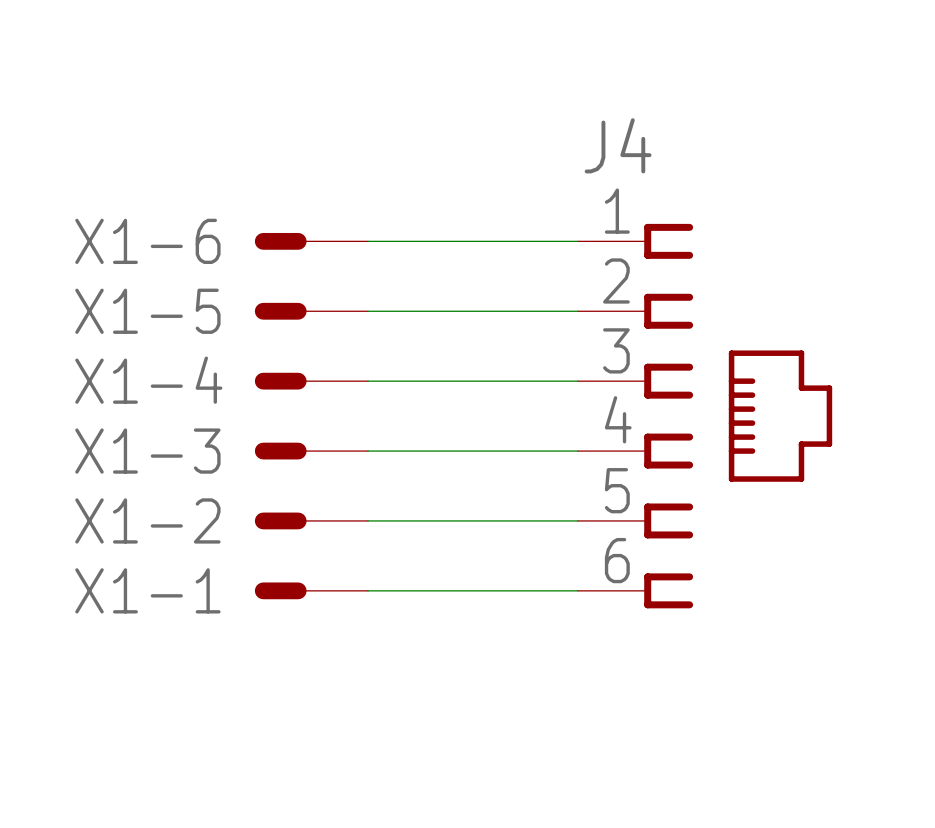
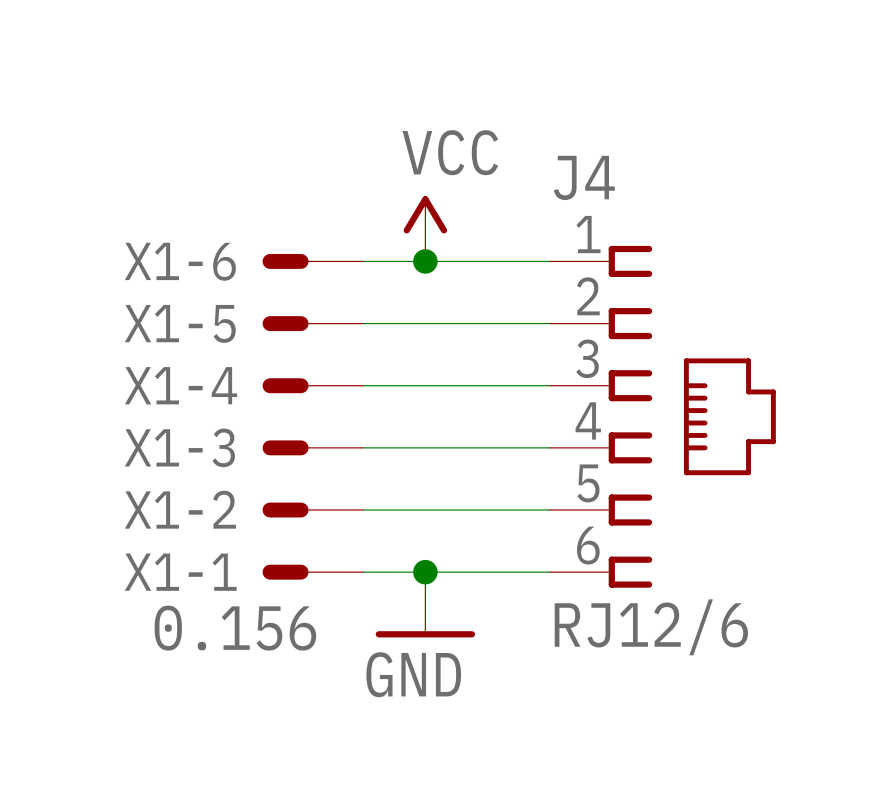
power symbol: none -> VCC (425, 228)
junction: none -> (425, 261)
junction: none -> (425, 572)
power symbol: none -> GND (425, 604)
X1-1 value: none -> 0.156 (235, 628)
J4 value: none -> RJ12/6 (651, 627)

